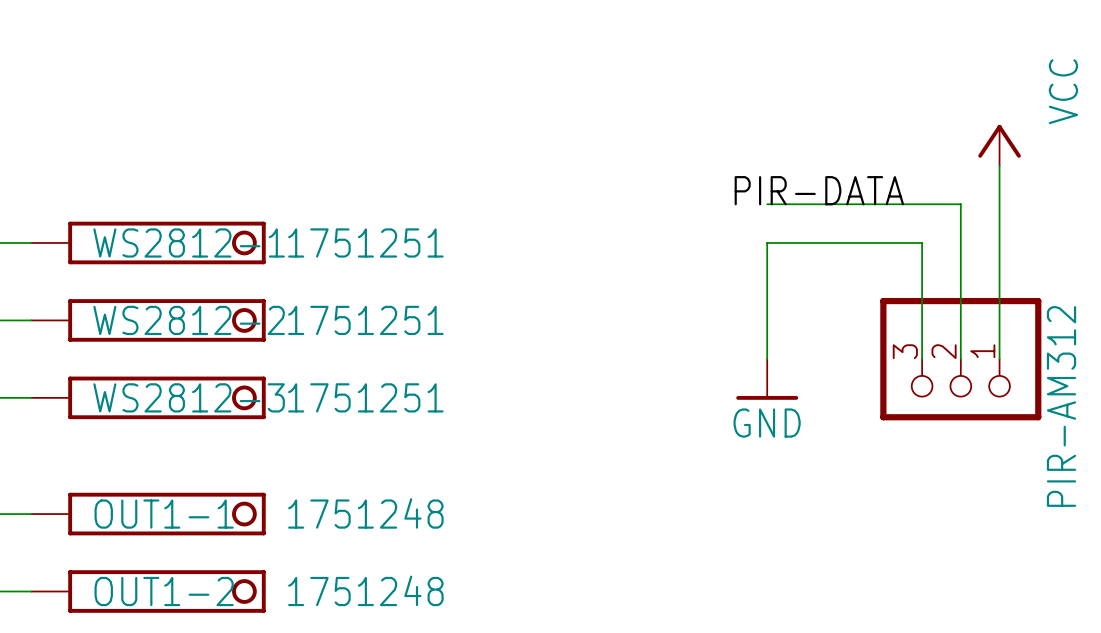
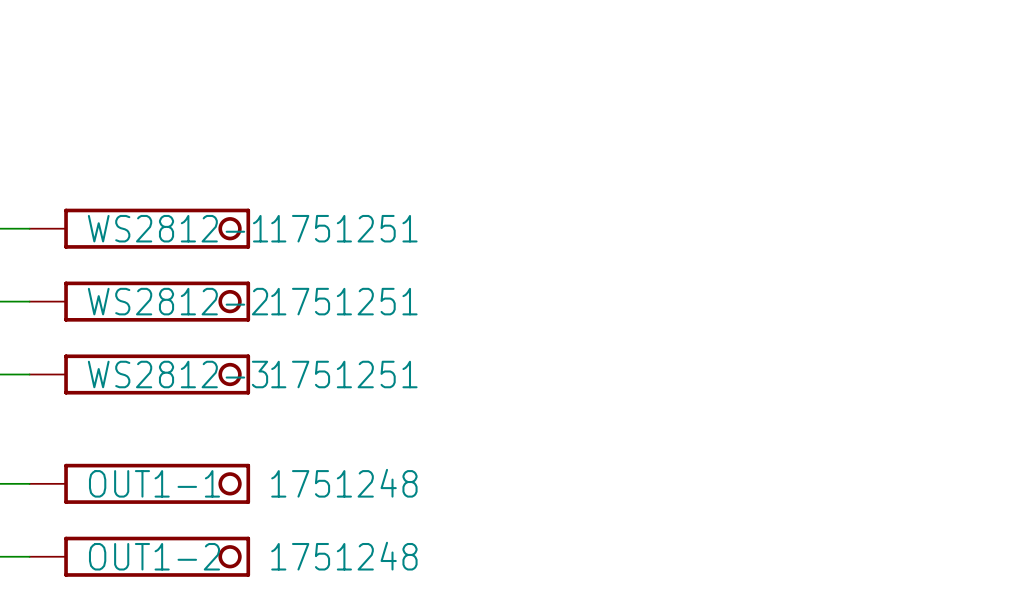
power symbol: VCC (999, 145) -> none
wire: (999, 165) (999, 359) -> none
label: PIR-DATA (819, 190) -> none
wire: (767, 204) (960, 204) (960, 359) -> none
wire: (767, 359) (767, 242) (922, 242) (922, 359) -> none
PIR-AM312: (960, 359) -> none
power symbol: GND (767, 379) -> none

